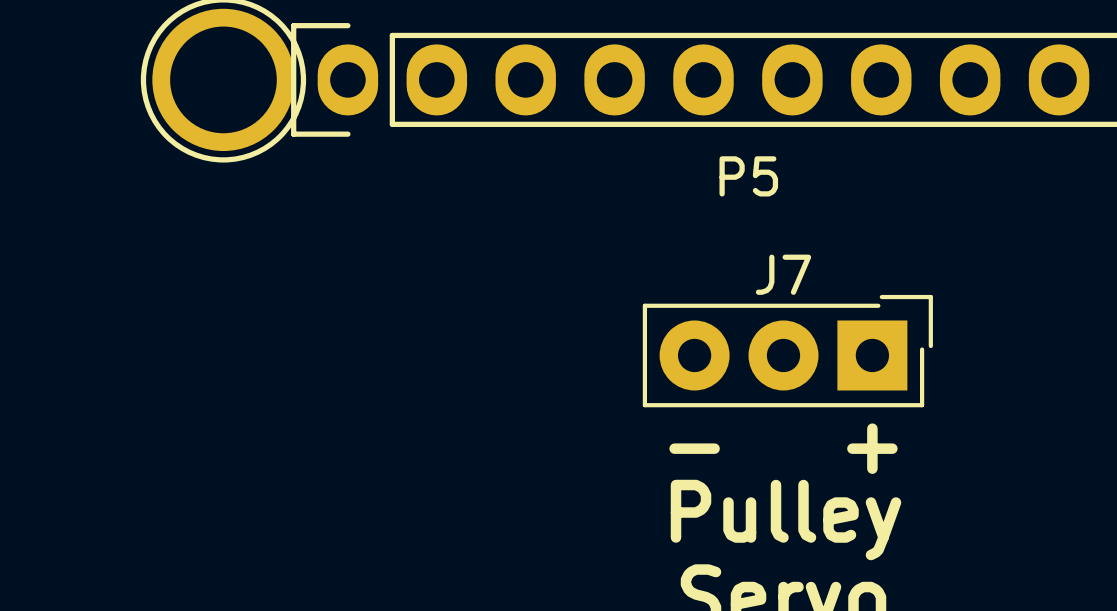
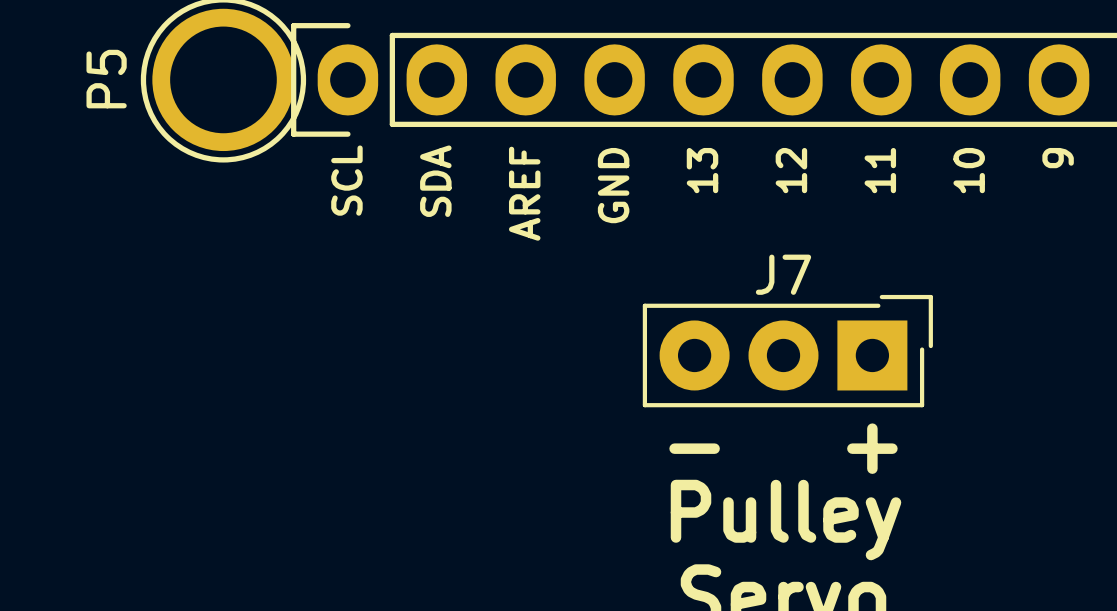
text: none -> 9 (1058, 158)
text: none -> 13 (702, 170)
text: none -> 12 (791, 170)
text: none -> 11 (880, 170)
text: none -> 10 (969, 170)
P5 name rotation: 0° (748, 176) -> 90° counterclockwise (106, 79)
P5 name position: P5 (748, 176) -> P5 (106, 79)
text: none -> SCL (346, 180)
text: none -> SDA (435, 181)
text: none -> GND (613, 185)
text: none -> AREF (524, 193)

